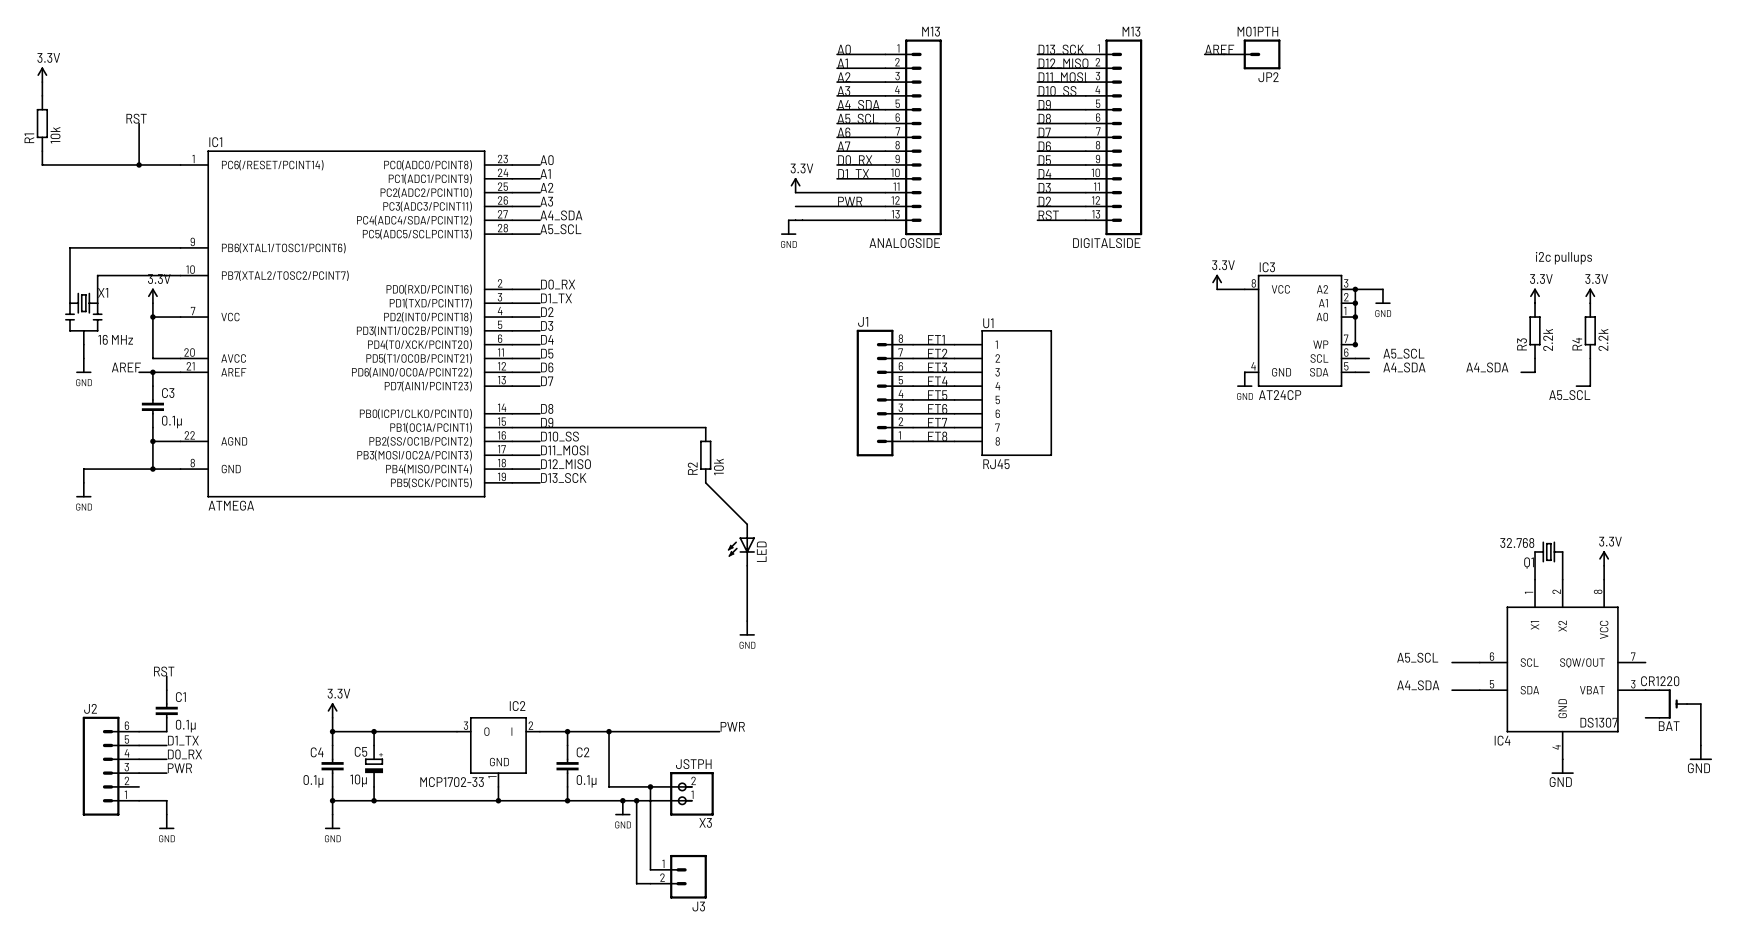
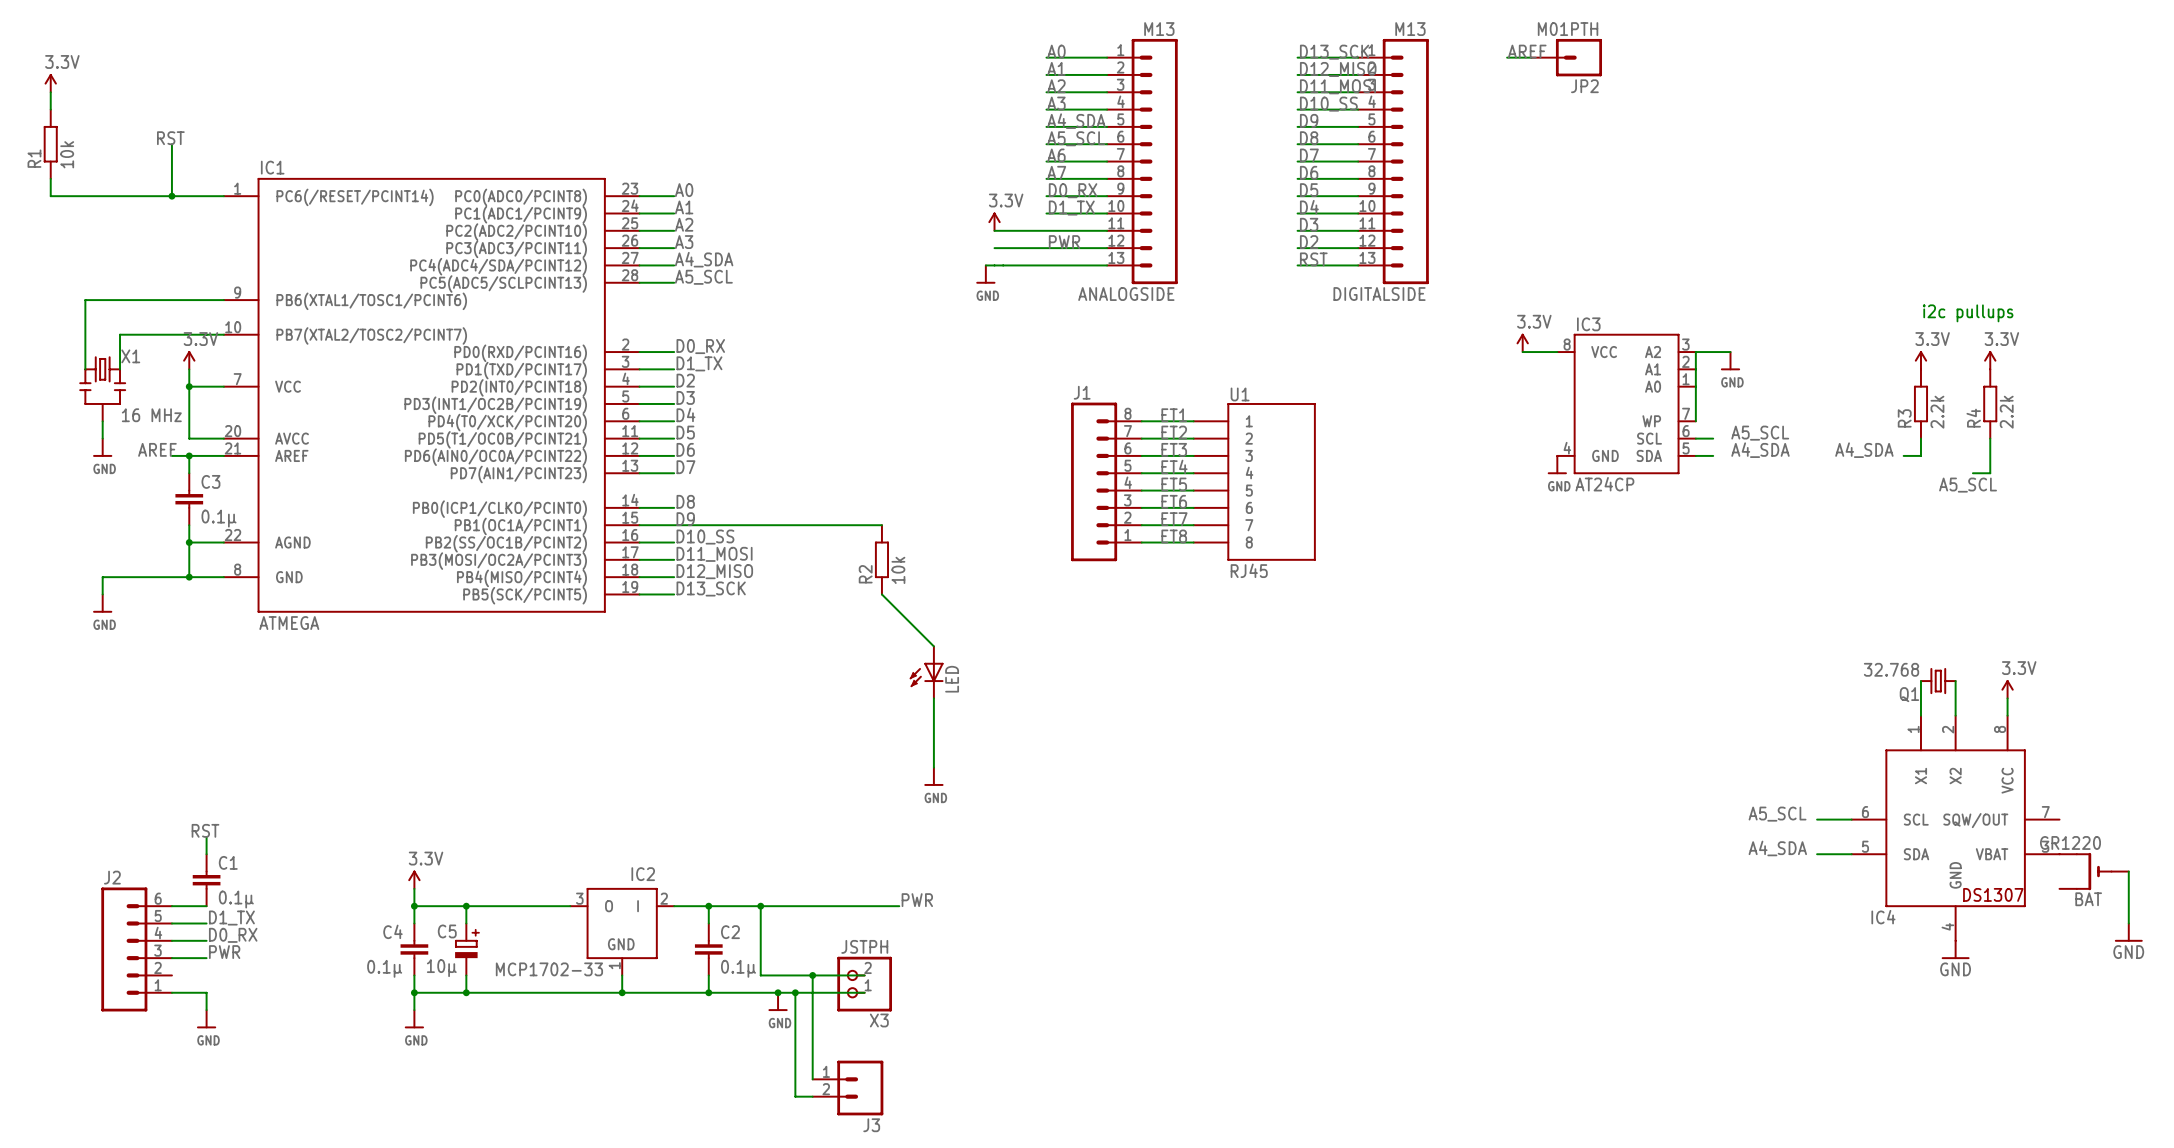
junction: (1355, 289) -> none
junction: (1355, 303) -> none
junction: (1355, 317) -> none
junction: (1355, 344) -> none

